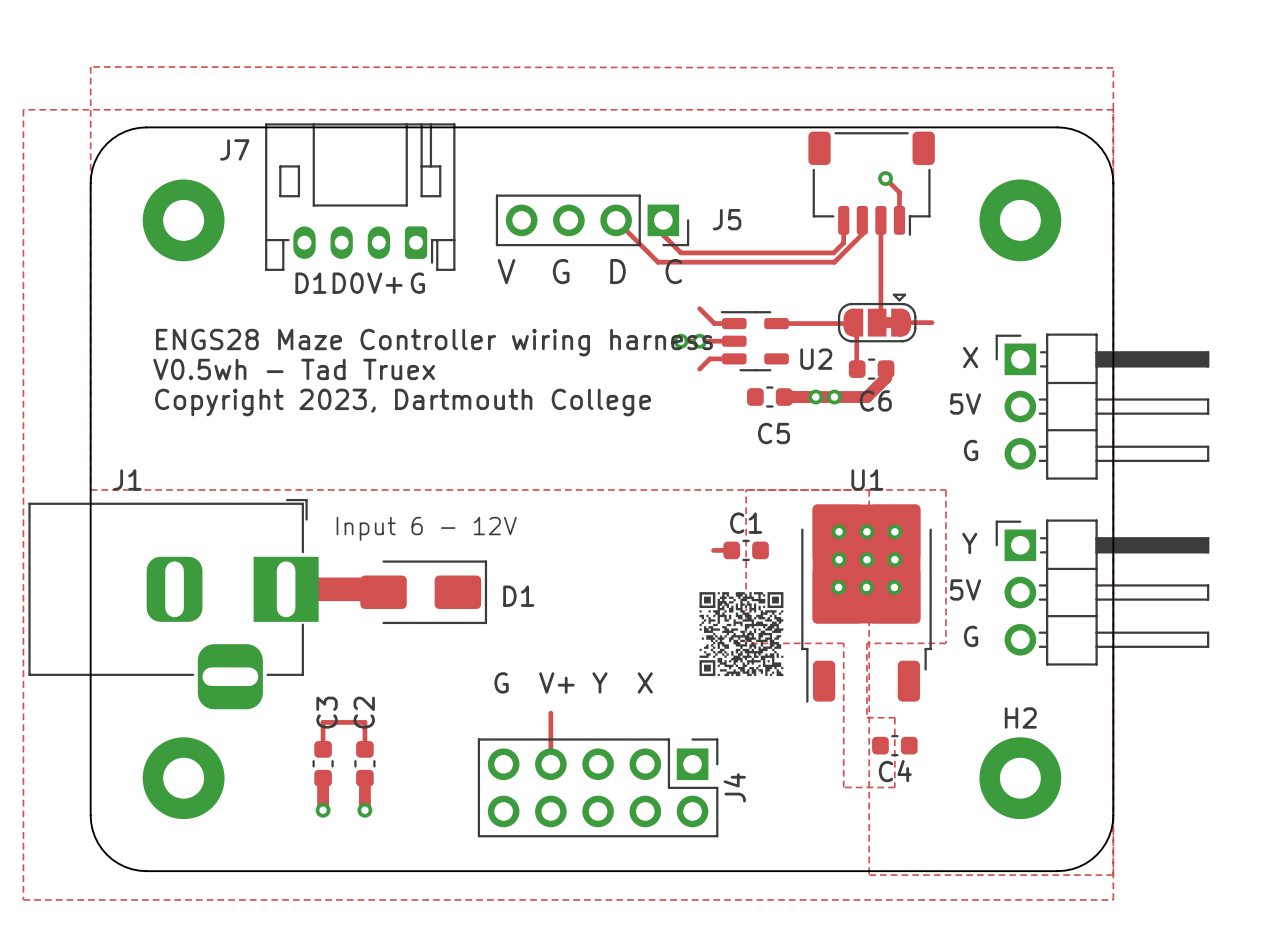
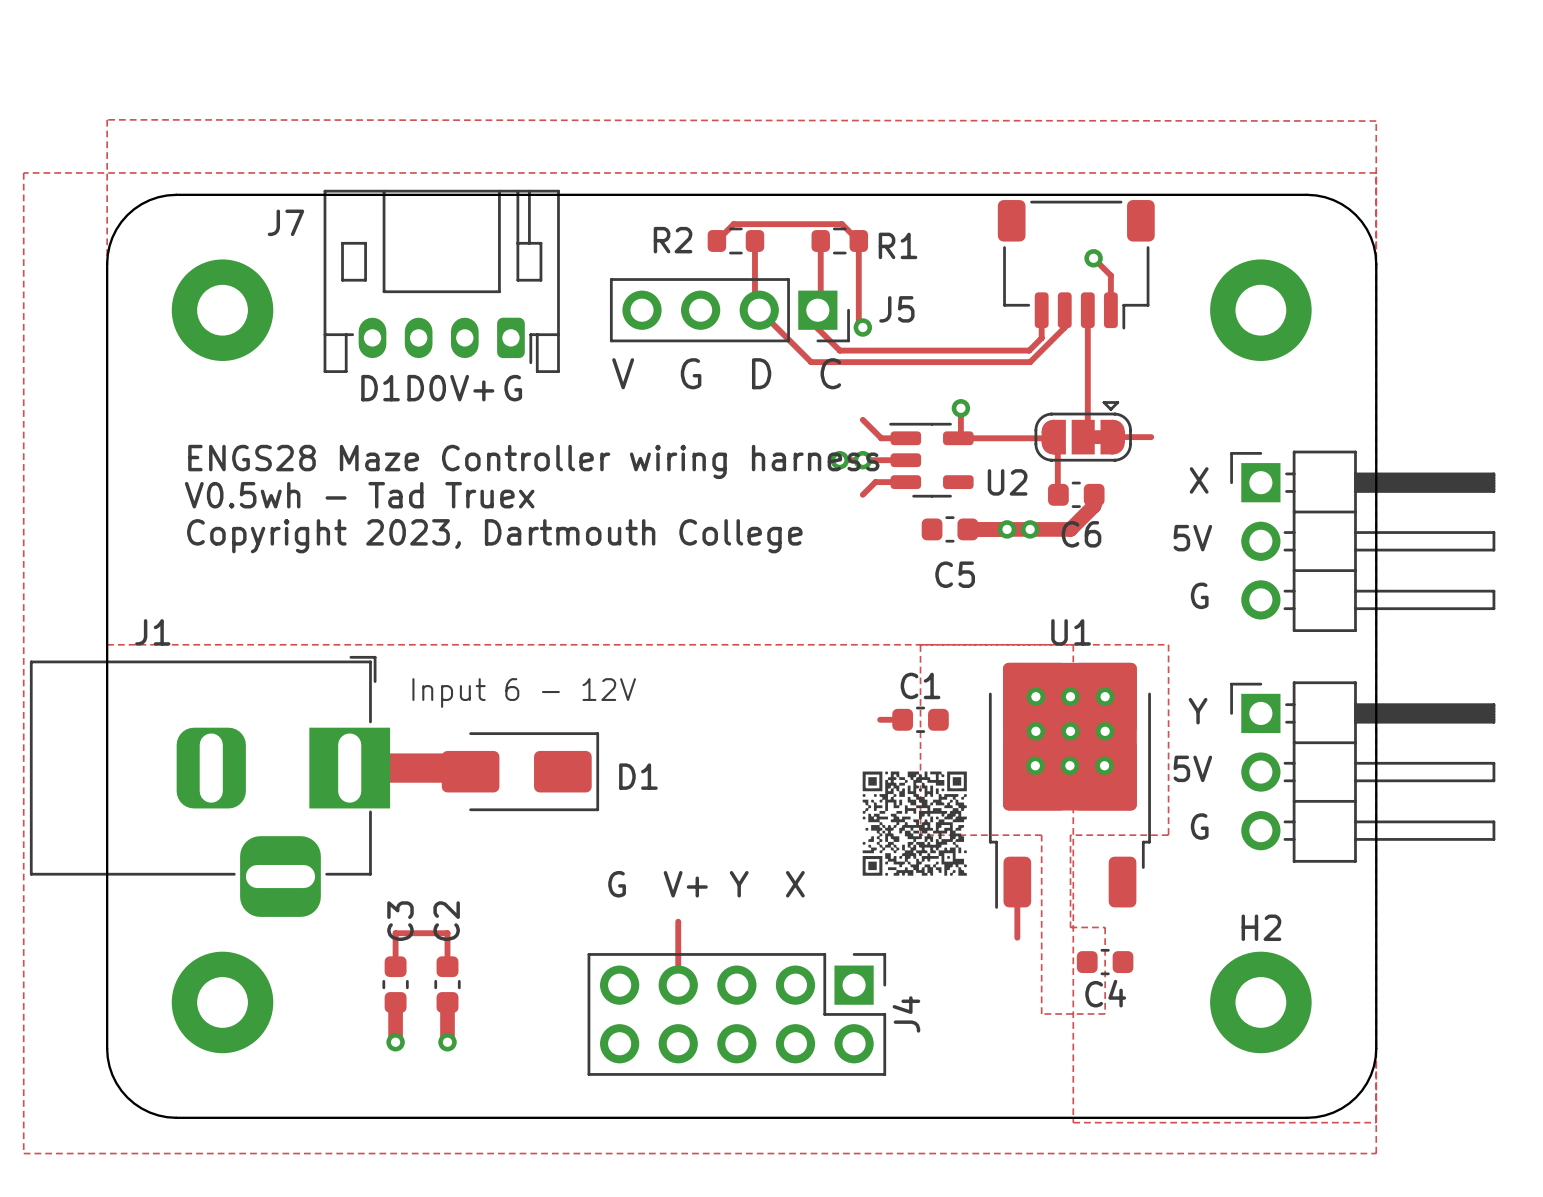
track: none -> (716, 240) (733, 224) (841, 224) (858, 240) (858, 323) (862, 327)
R2: none -> (735, 240)
track: none -> (754, 240) (754, 305) (759, 310)
track: none -> (820, 240) (820, 307) (817, 310)
R1: none -> (839, 240)
via: none -> (862, 327)
track: none -> (960, 408) (960, 435) (958, 438)
via: none -> (960, 408)
track: none -> (1017, 882) (1017, 937)

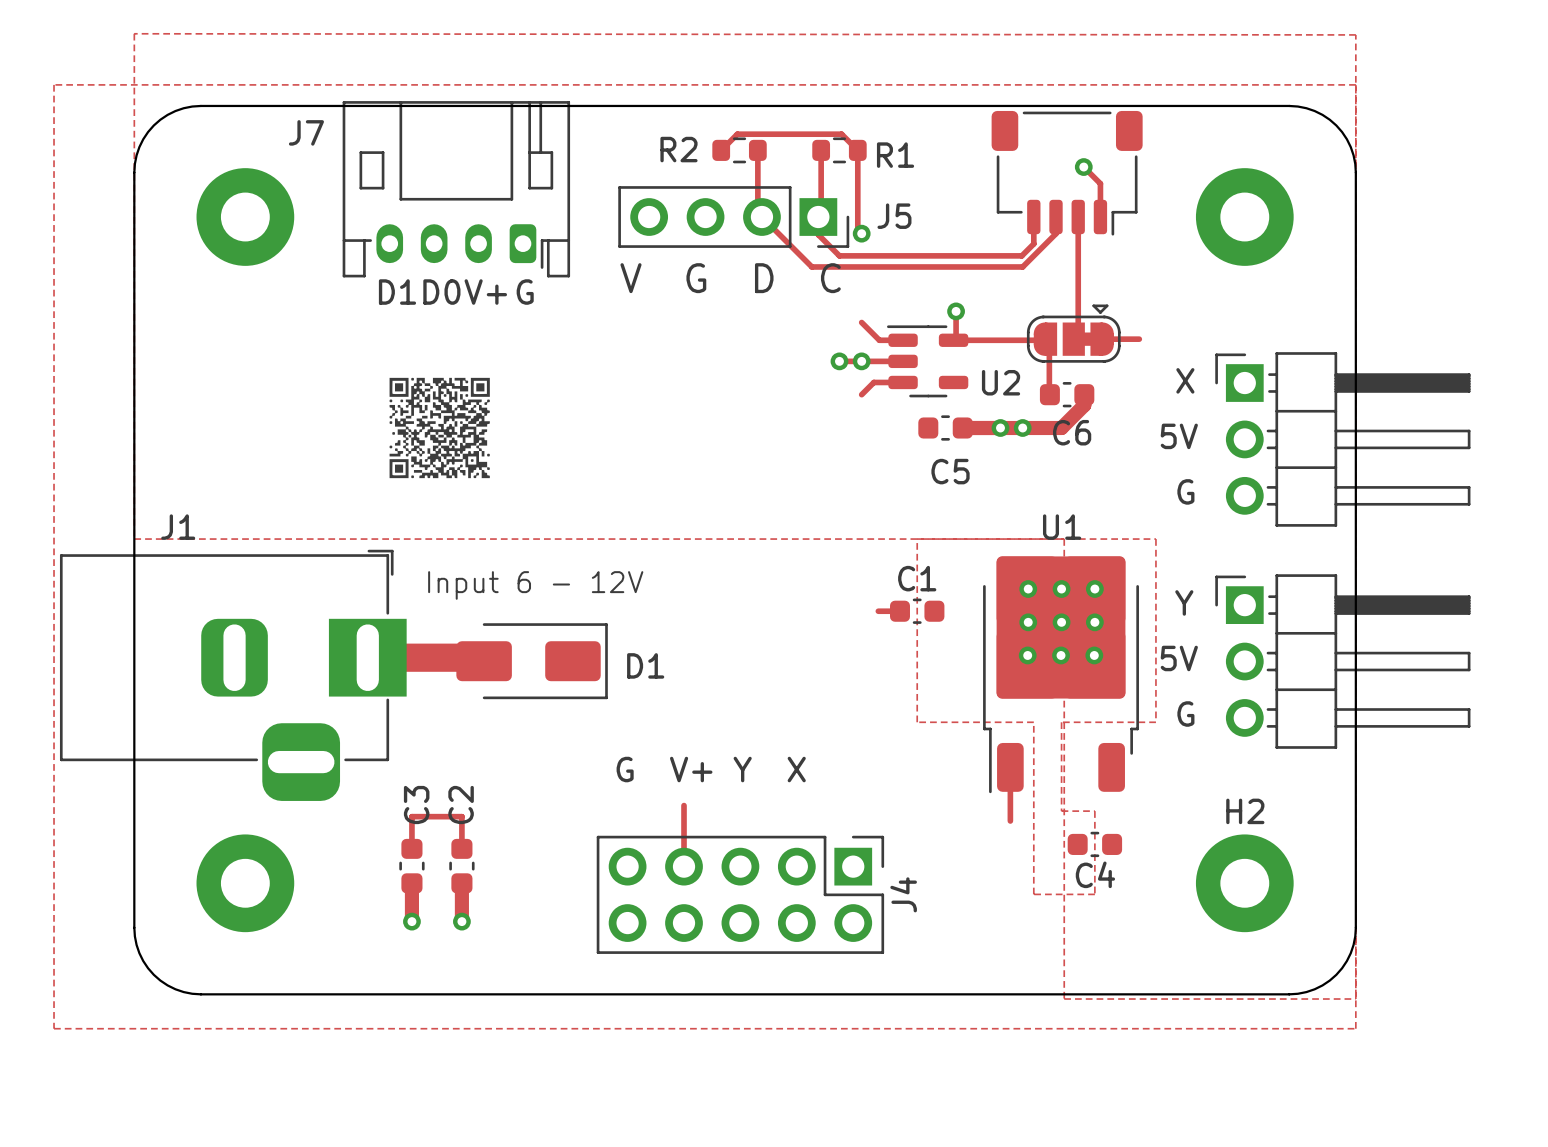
text: ENGS28 Maze Controller wiring harness (533, 461) -> none
text: V0.5wh - Tad Truex (359, 495) -> none
text: Copyright 2023, Dartmouth College (494, 536) -> none
drawing position: (914, 823) -> (439, 428)

